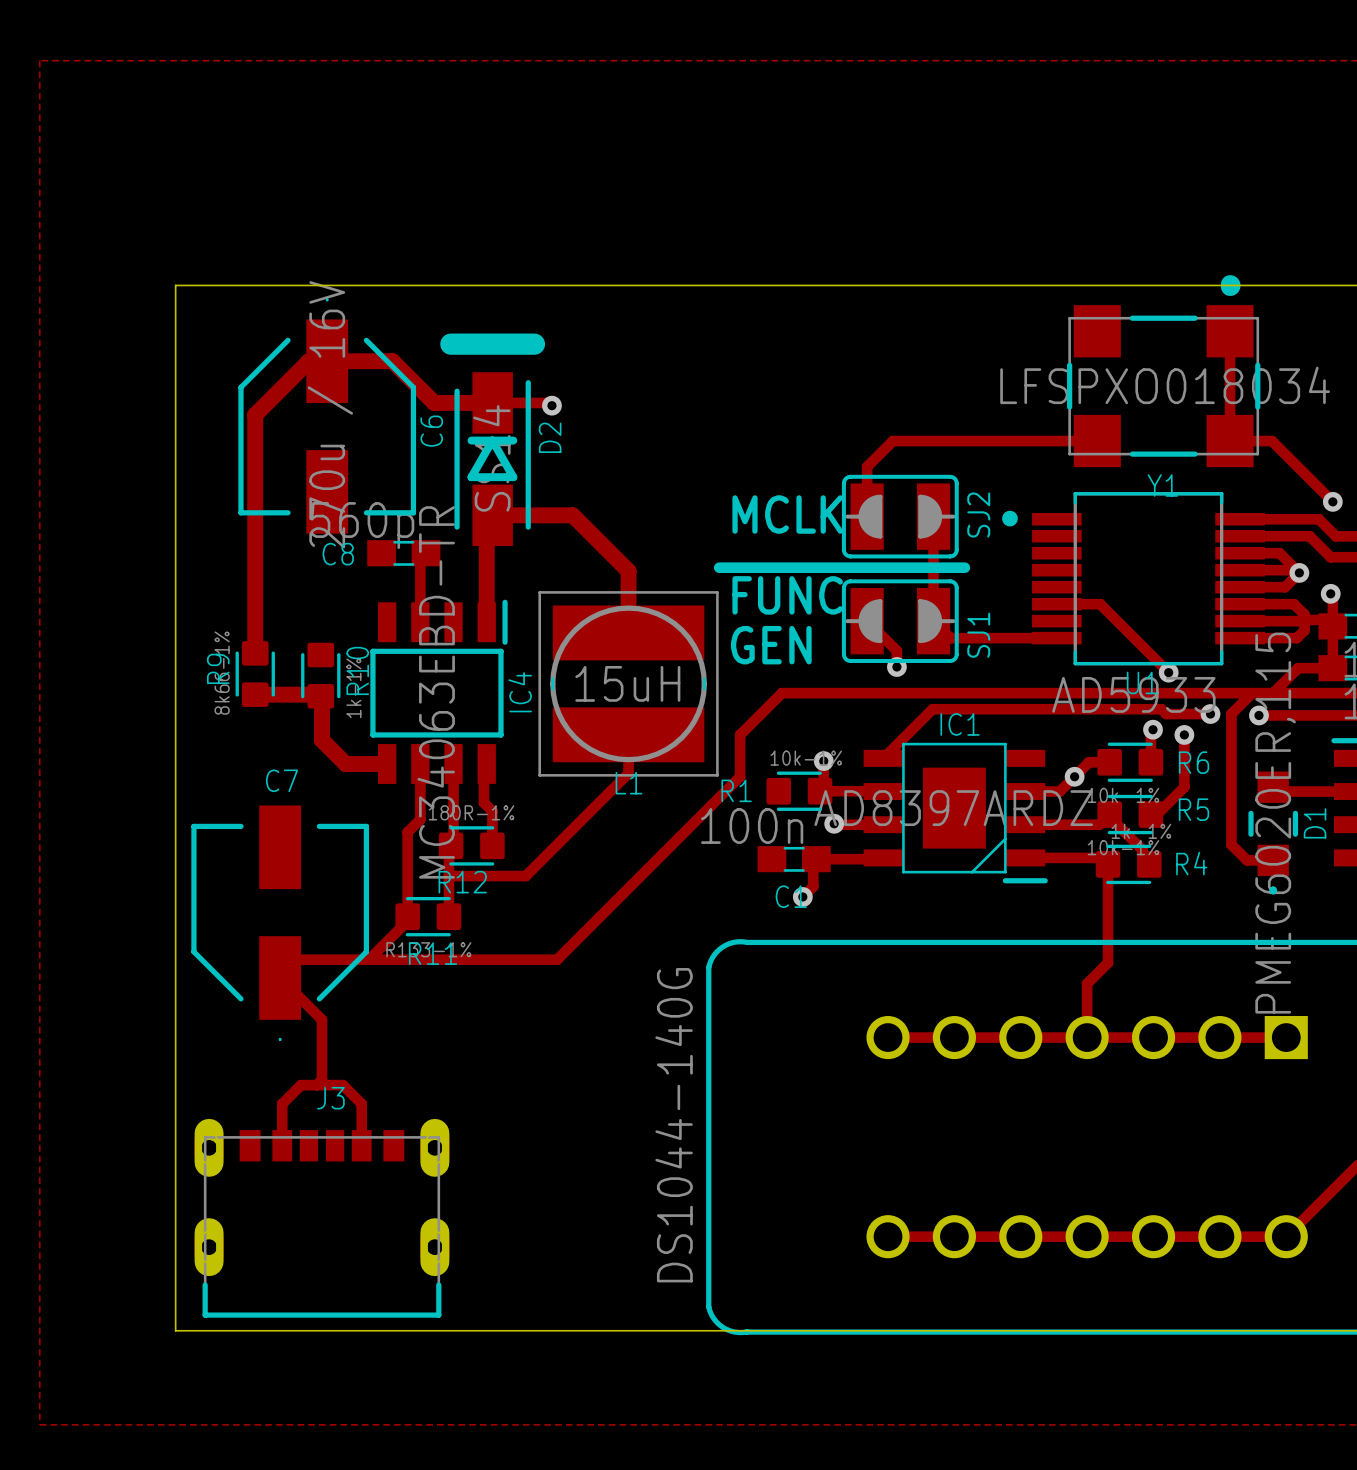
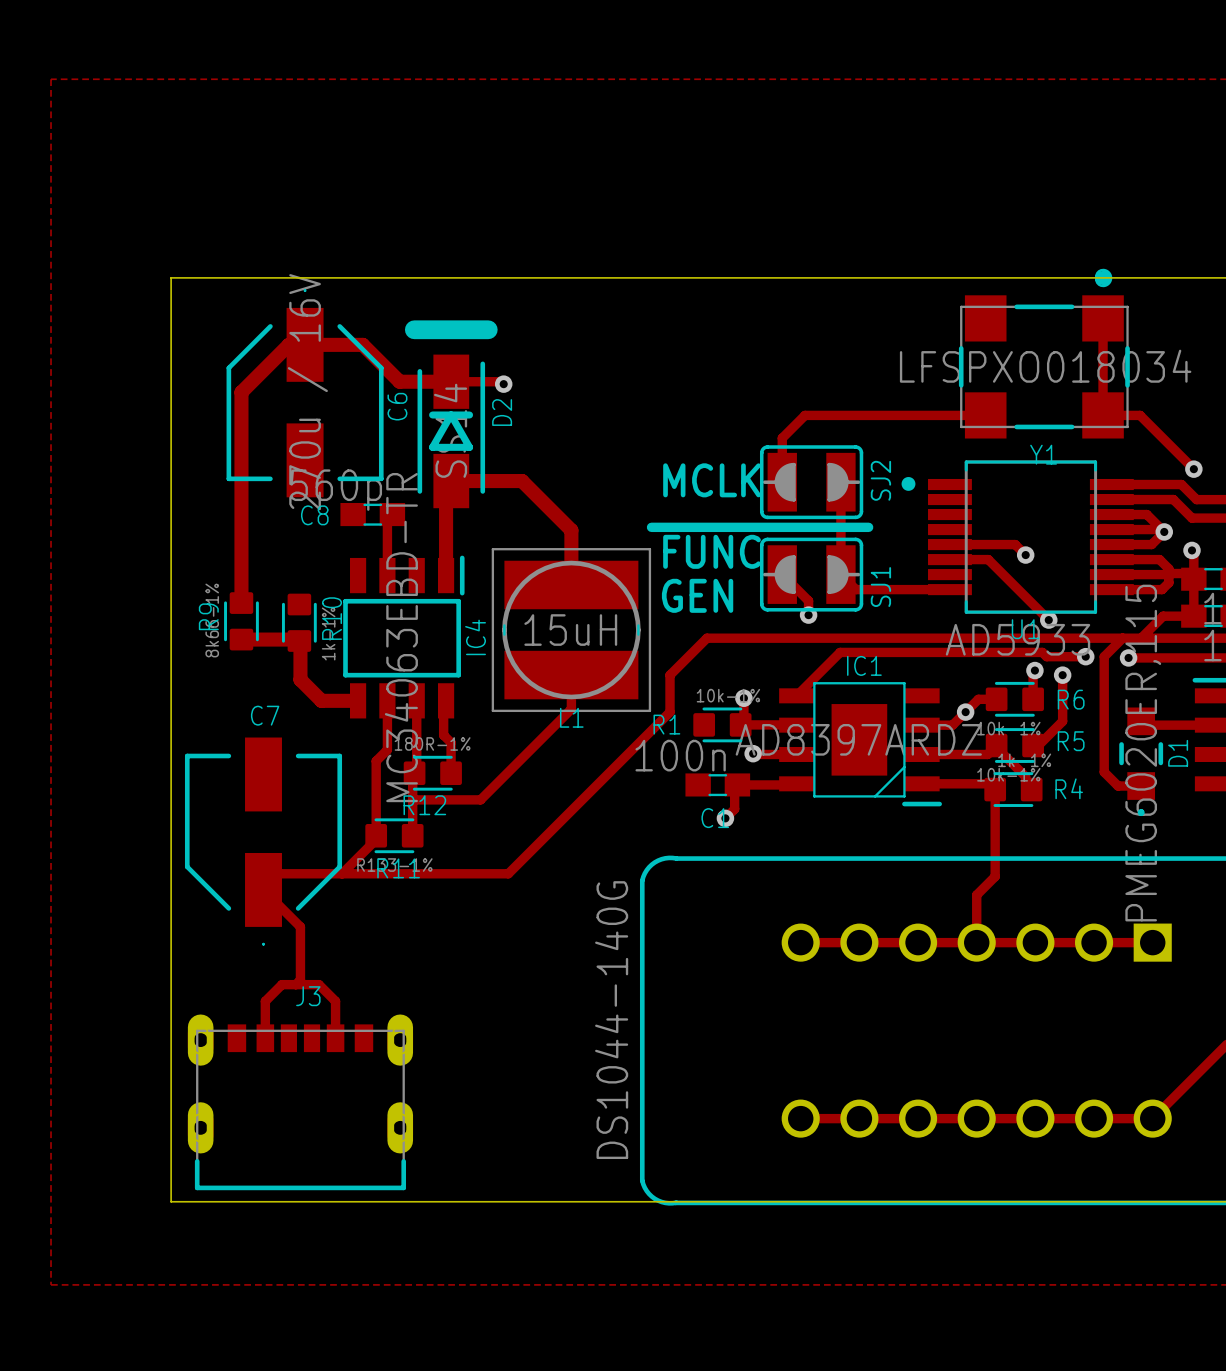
track: none -> (949, 544) (1015, 544) (1025, 555)
via: none -> (1025, 555)

